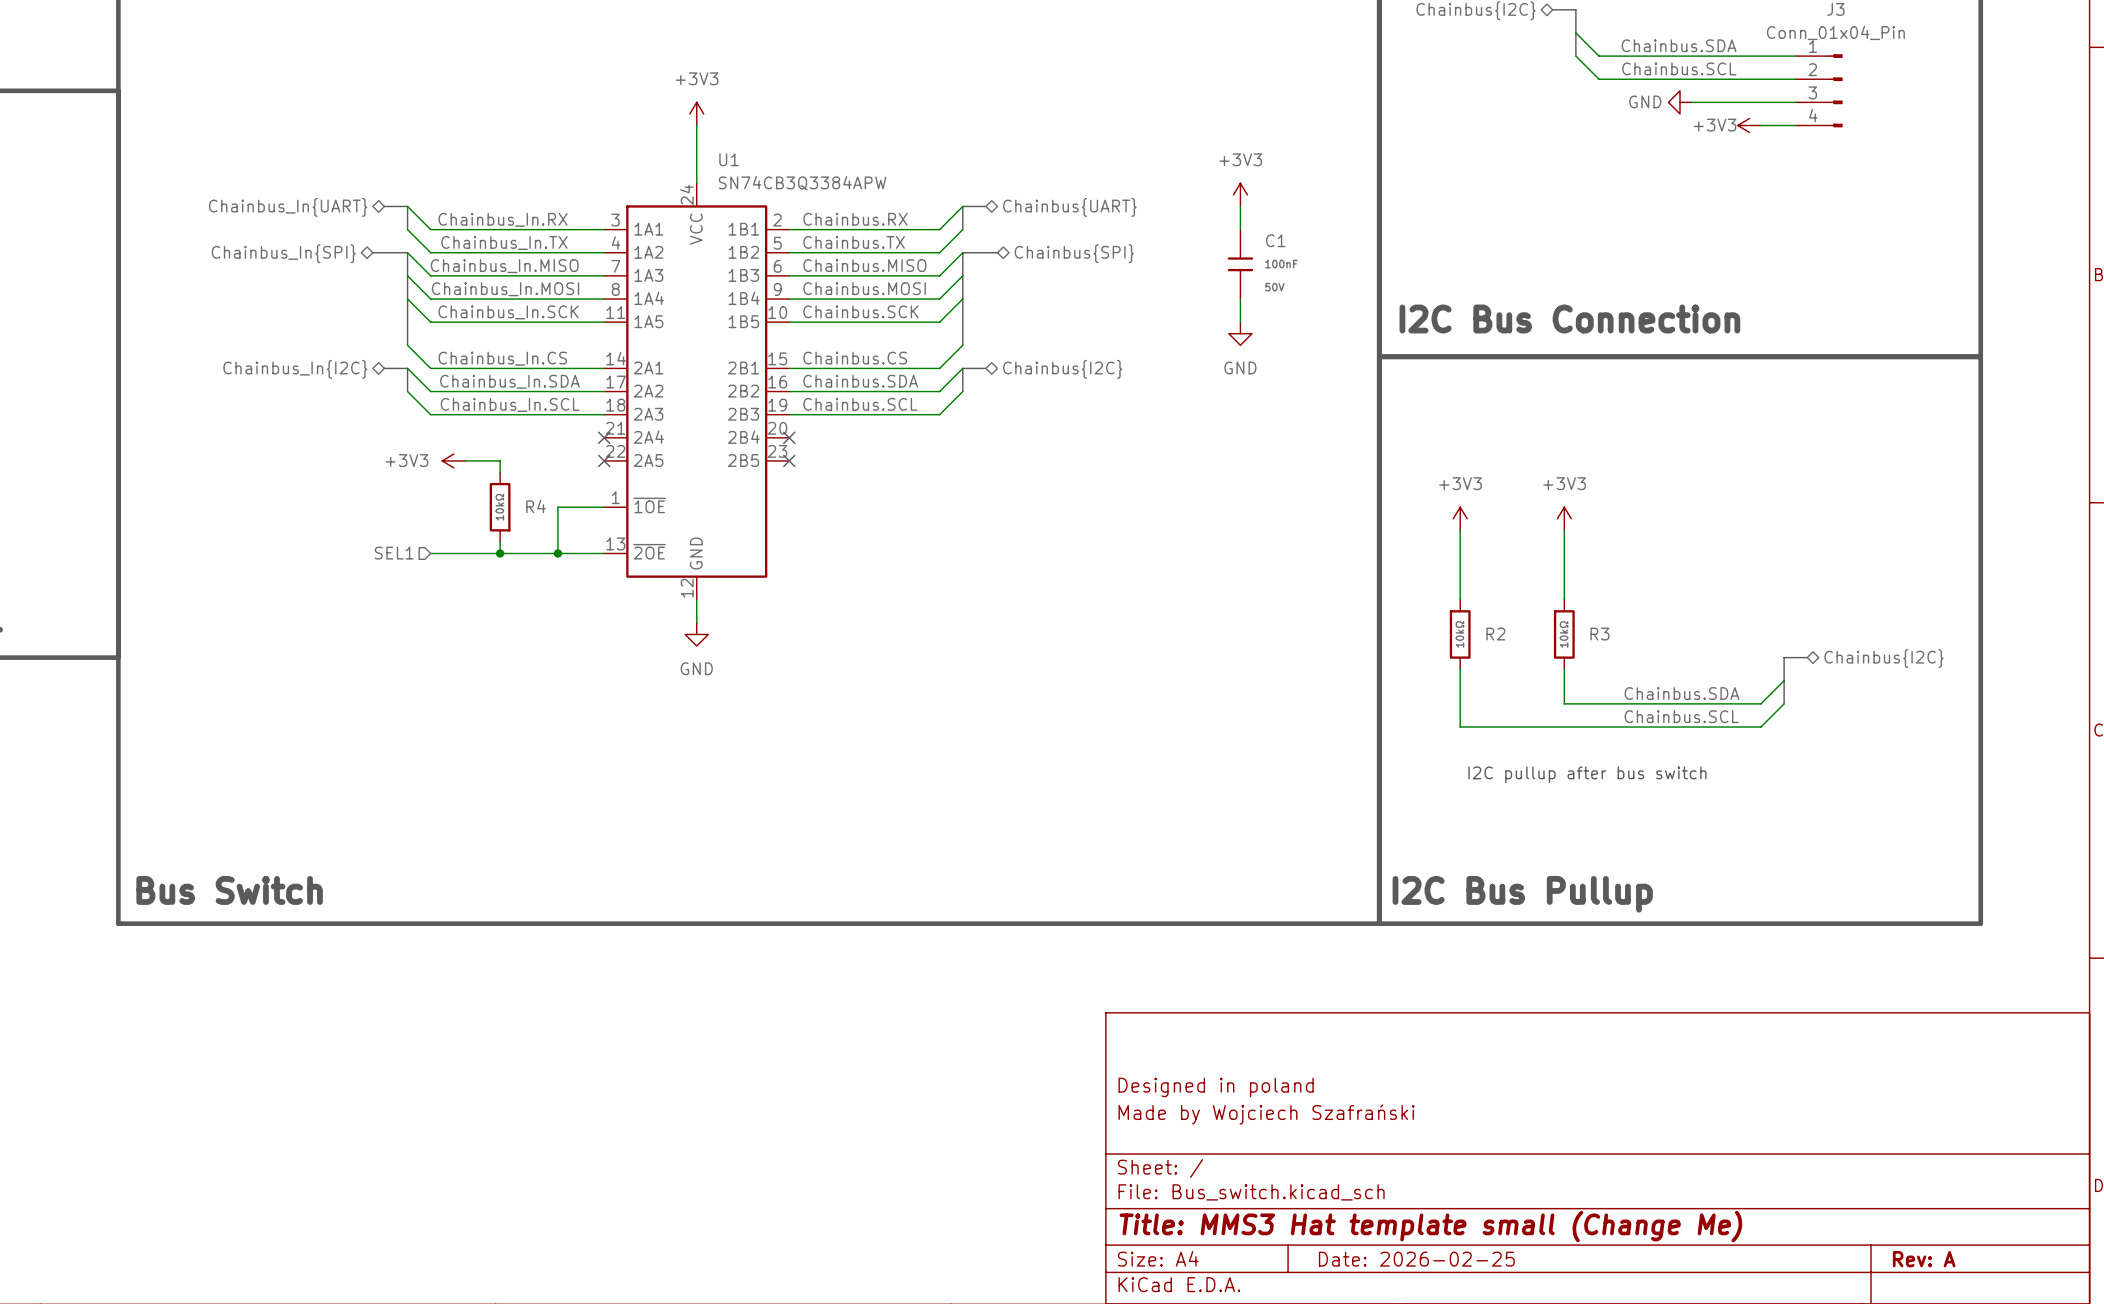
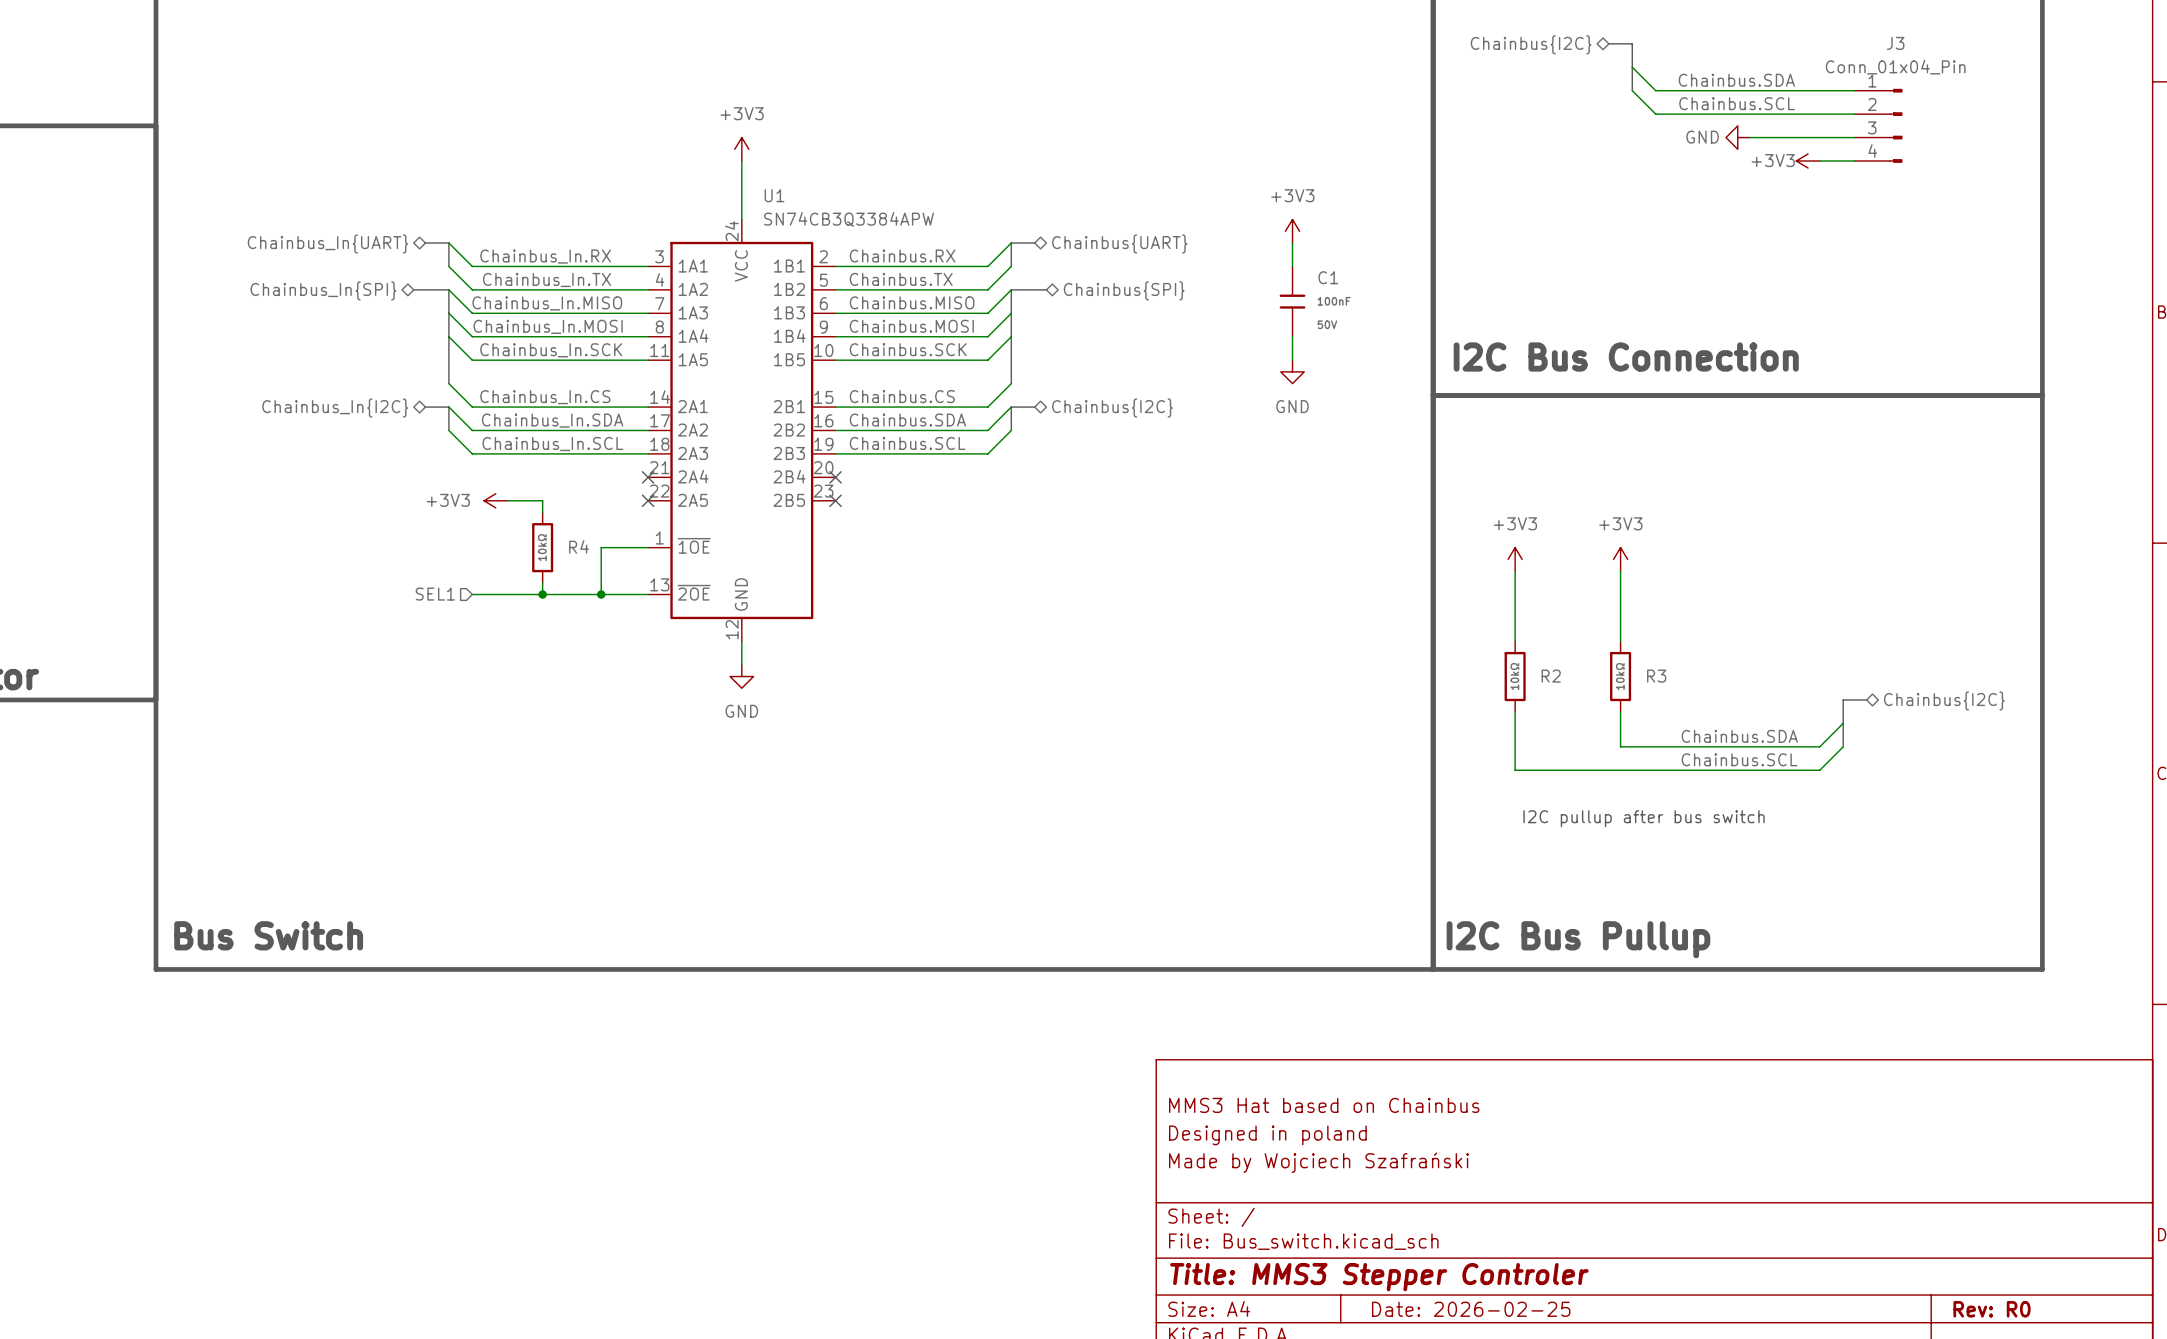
title block: none -> MMS3 Hat based on Chainbus (1324, 1105)
title block: Title: MMS3 Hat template small (Change Me) (1430, 1226) -> Title: MMS3 Stepper Controler (1379, 1277)
title block: Rev: A (1924, 1259) -> Rev: R0 (1992, 1309)

